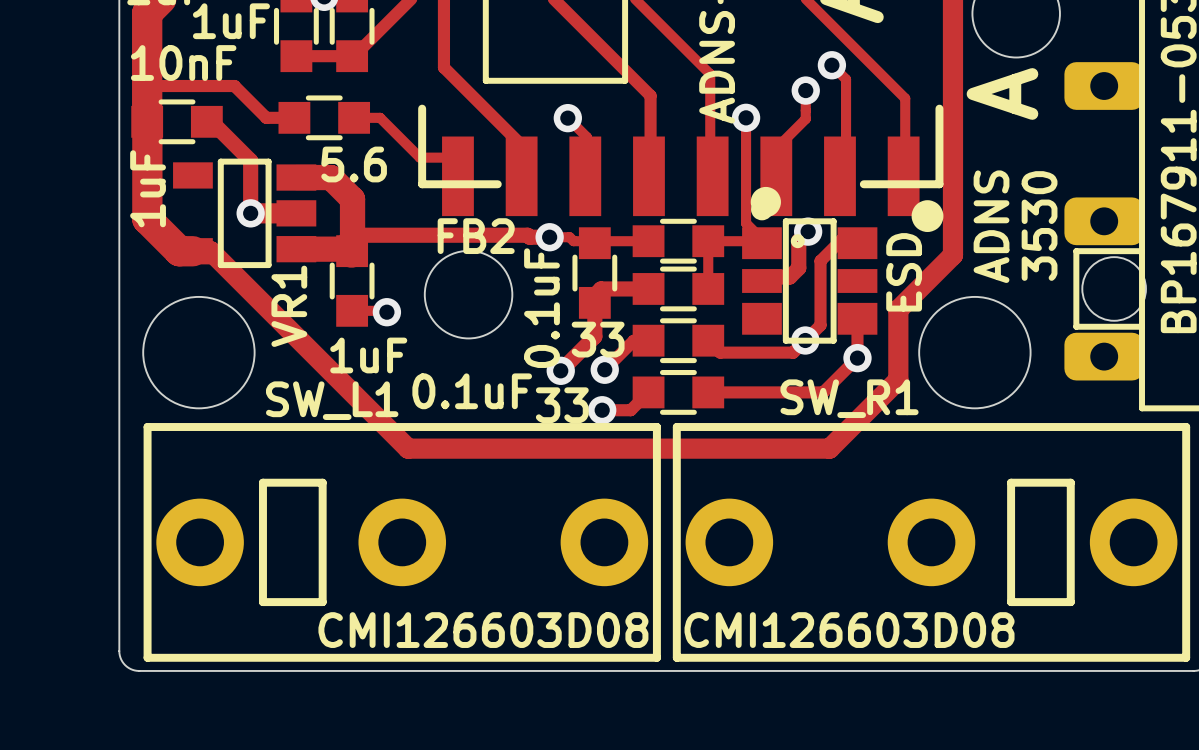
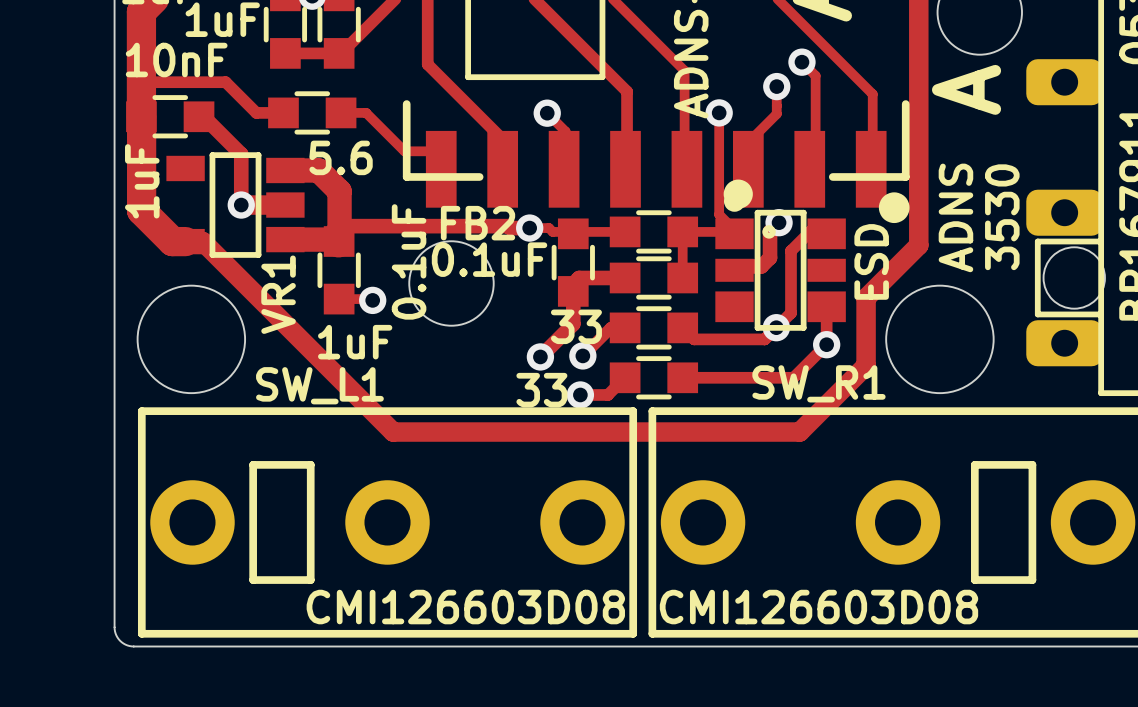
FB2 name position: FB2 (476, 236) -> FB2 (478, 223)
part value position: 0.1uF (542, 308) -> 0.1uF (409, 261)
part value position: 0.1uF (472, 391) -> 0.1uF (489, 259)

